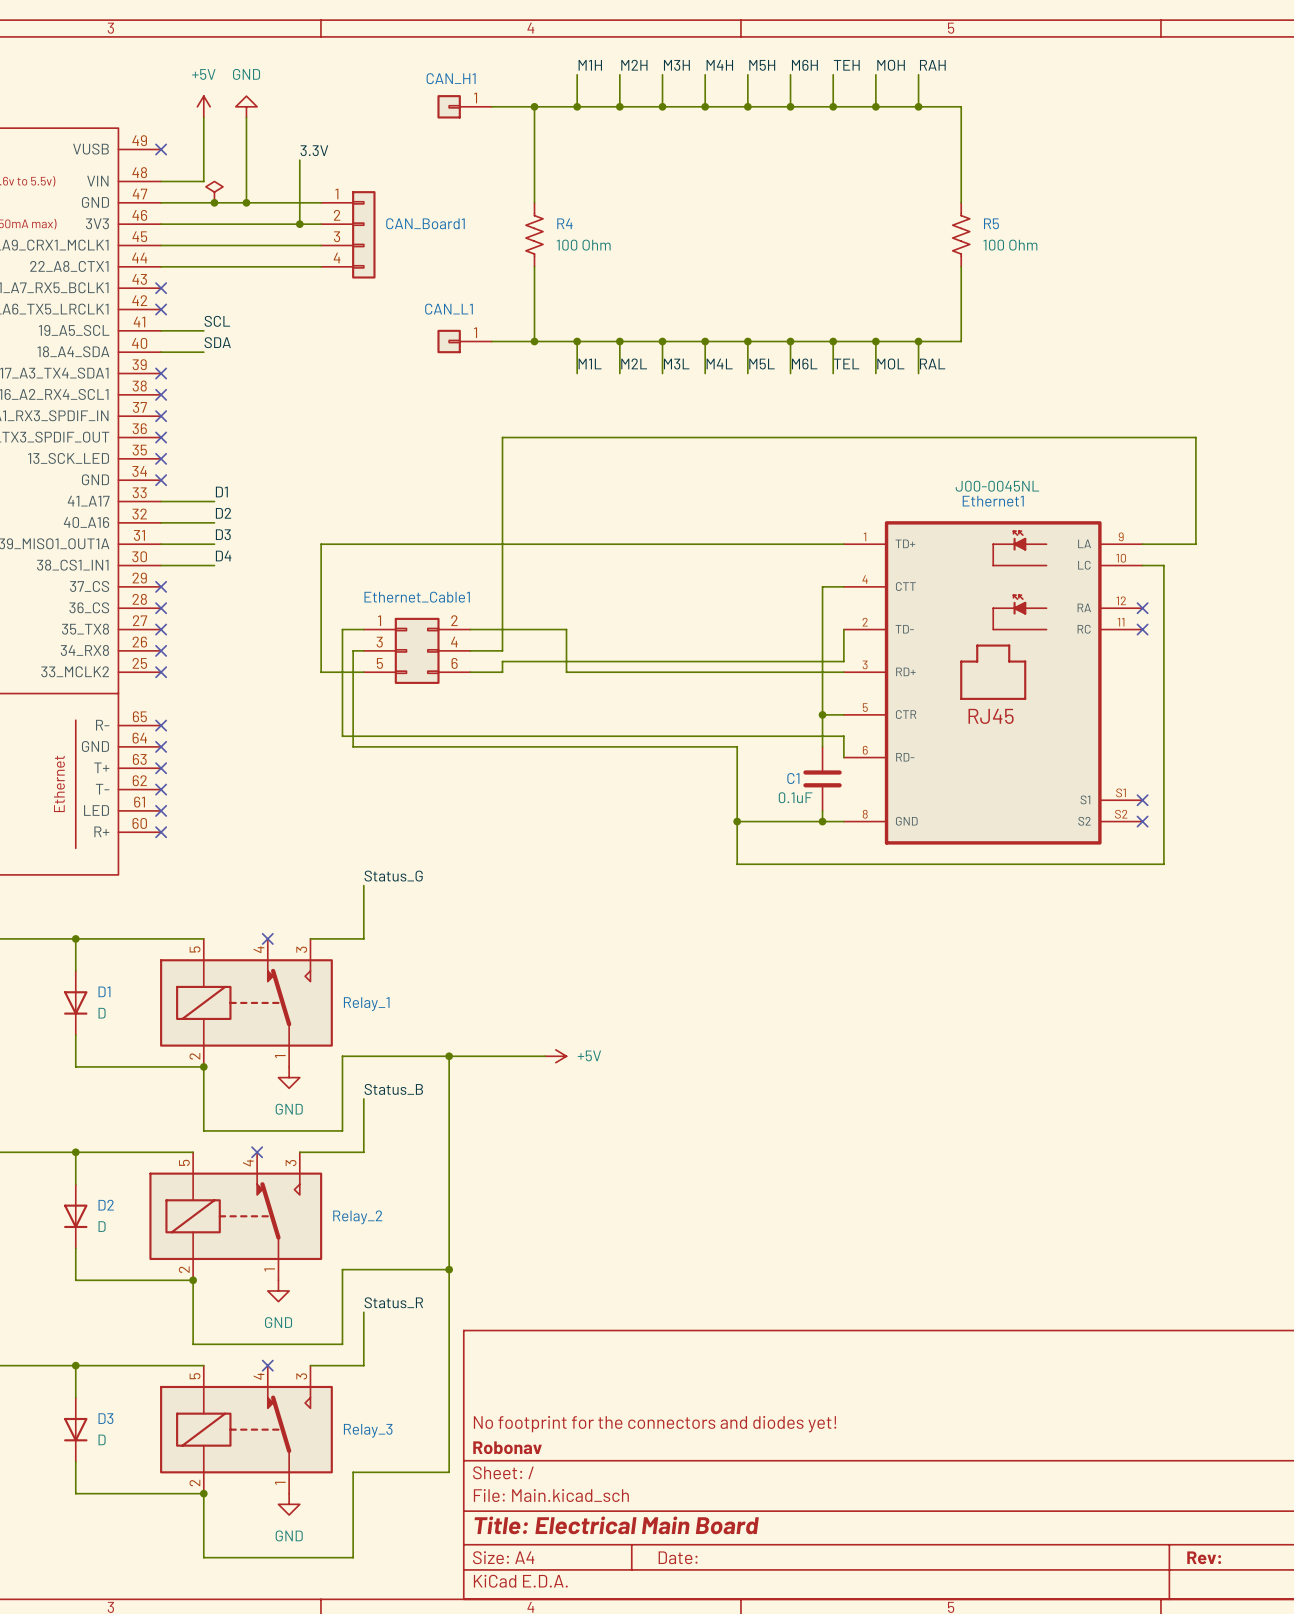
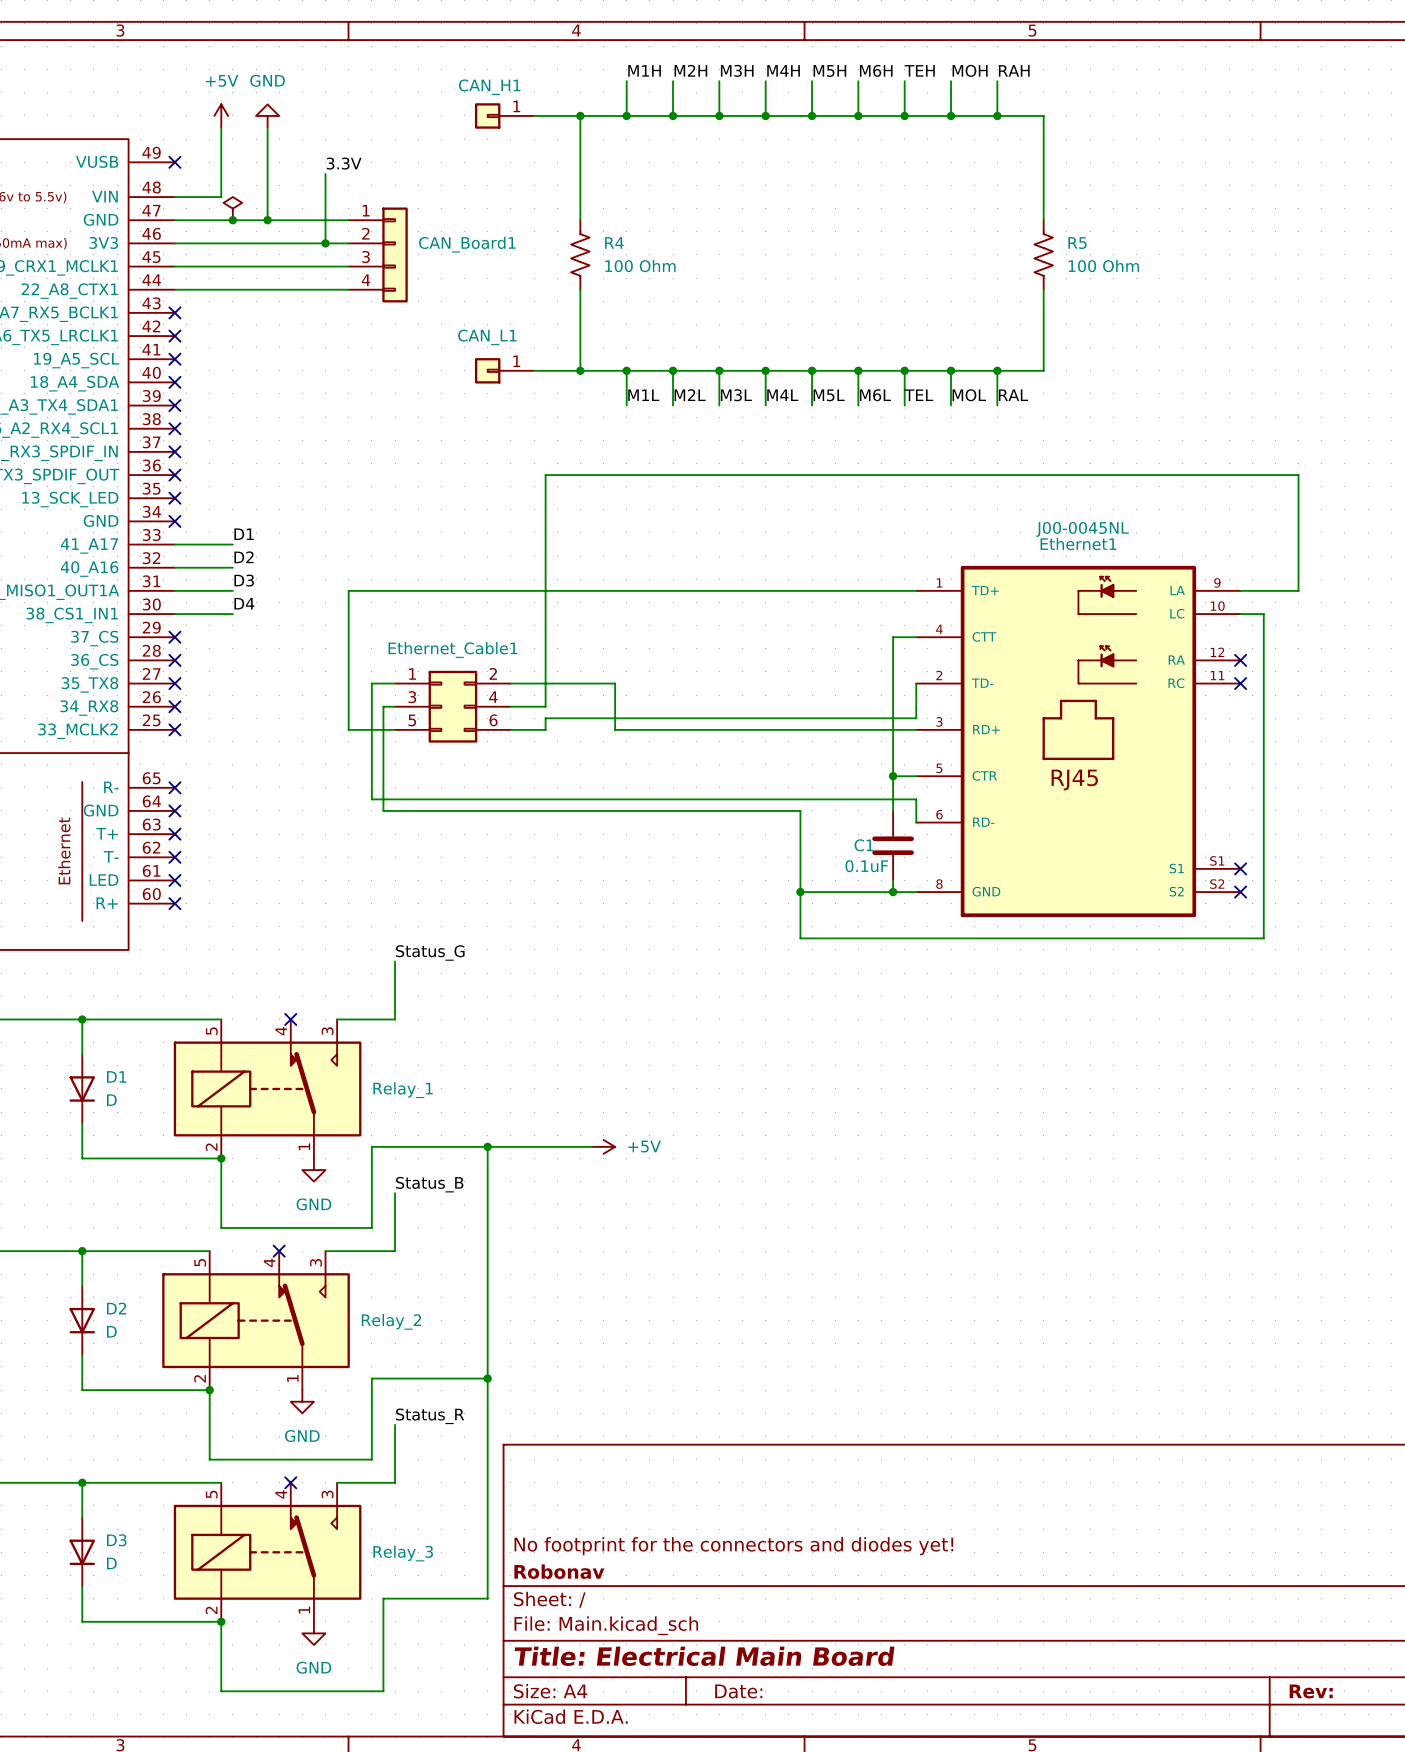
label: SCL (217, 321) -> none
wire: (161, 330) (203, 330) -> none
no-connect mark: none -> (174, 359)
label: SDA (217, 342) -> none
wire: (161, 352) (203, 352) -> none
no-connect mark: none -> (174, 382)

